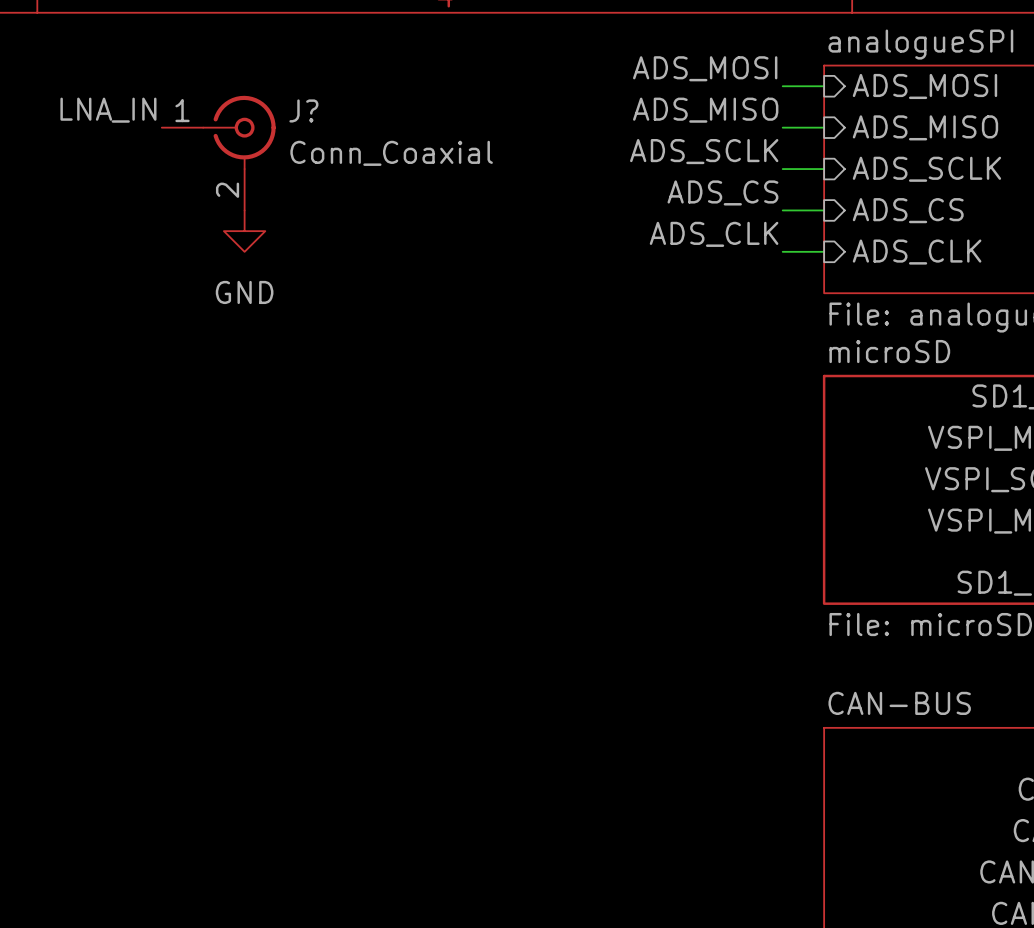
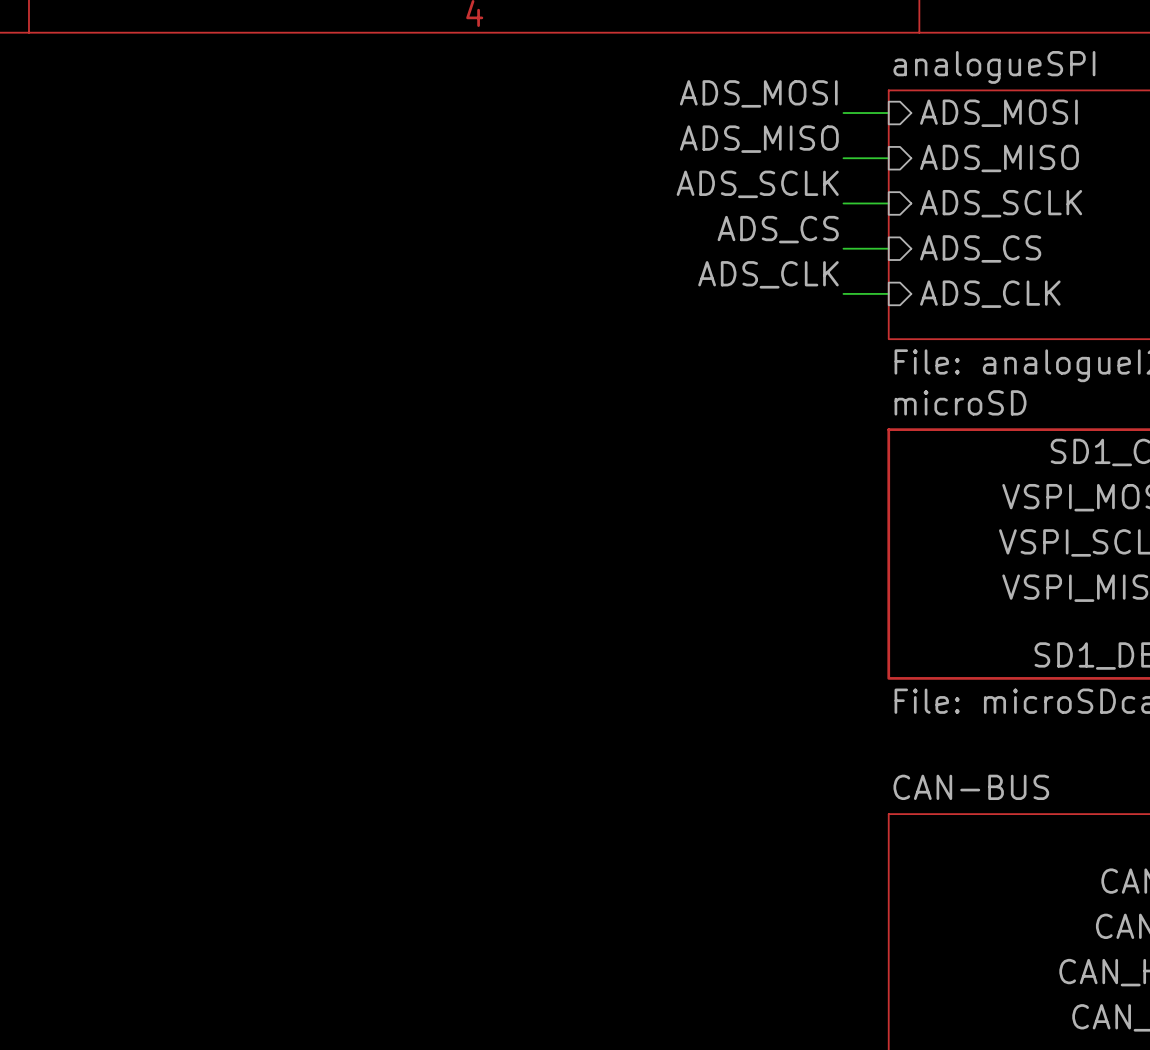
label: LNA_IN (108, 110) -> none
J?: Conn_Coaxial (218, 153) -> none
power symbol: GND (244, 231) -> none

